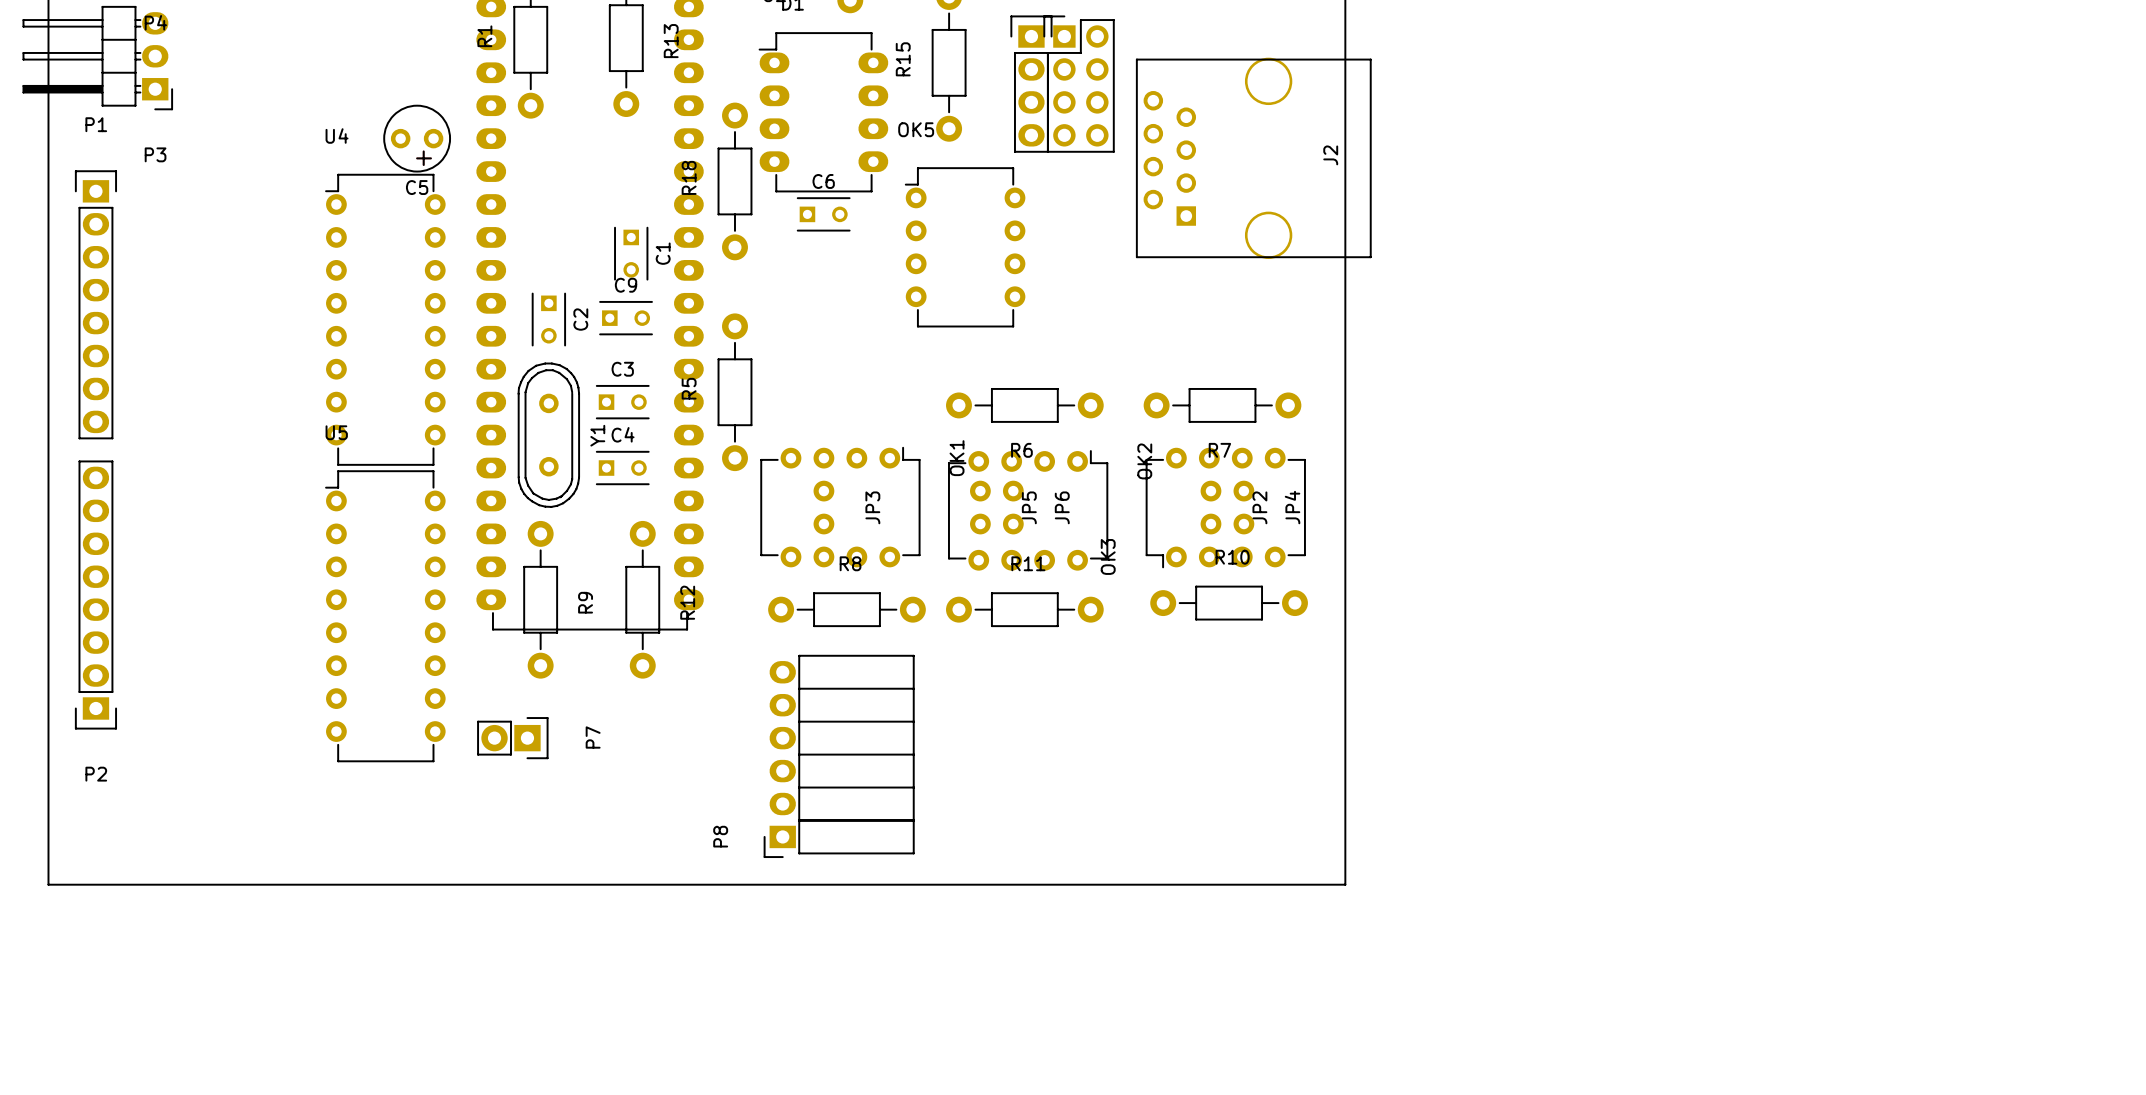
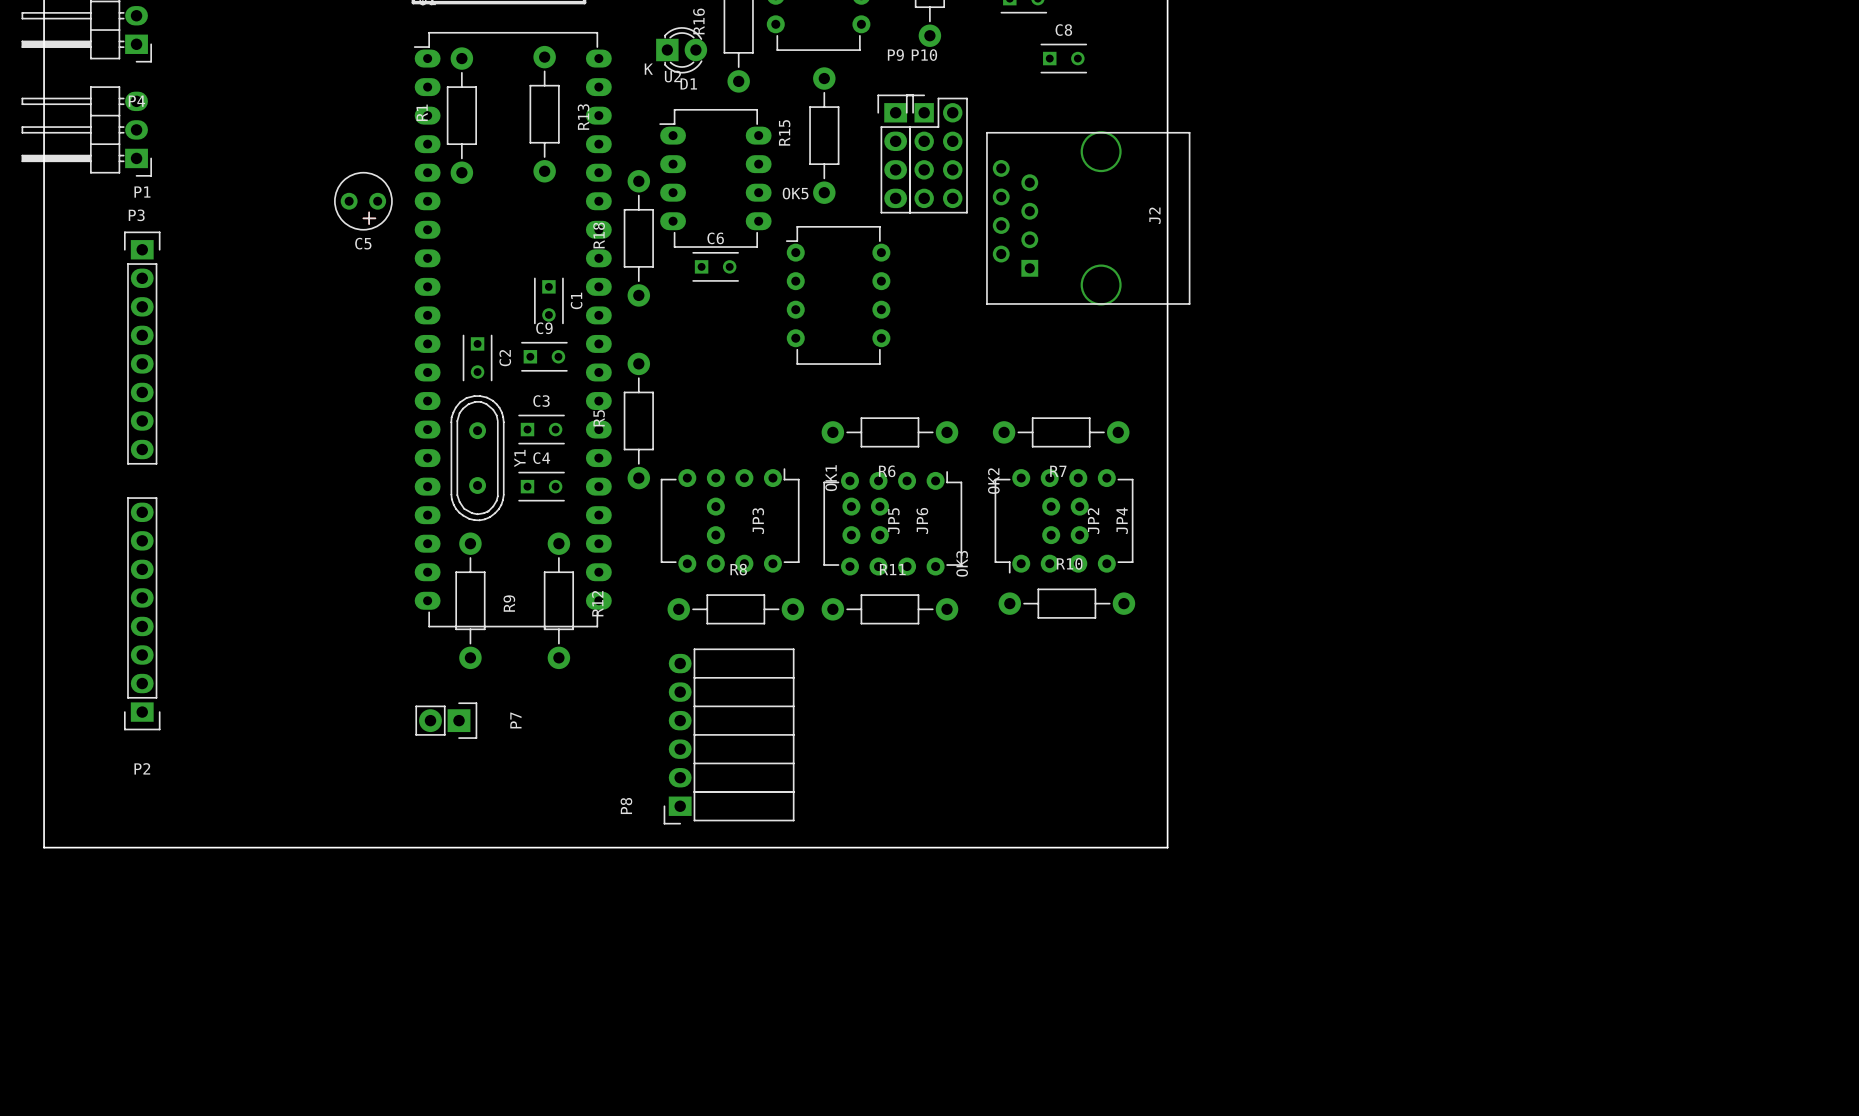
P1 position: (95, 304) -> (142, 348)
U4: (385, 319) -> none
P2 position: (95, 595) -> (142, 613)
U5: (385, 616) -> none

